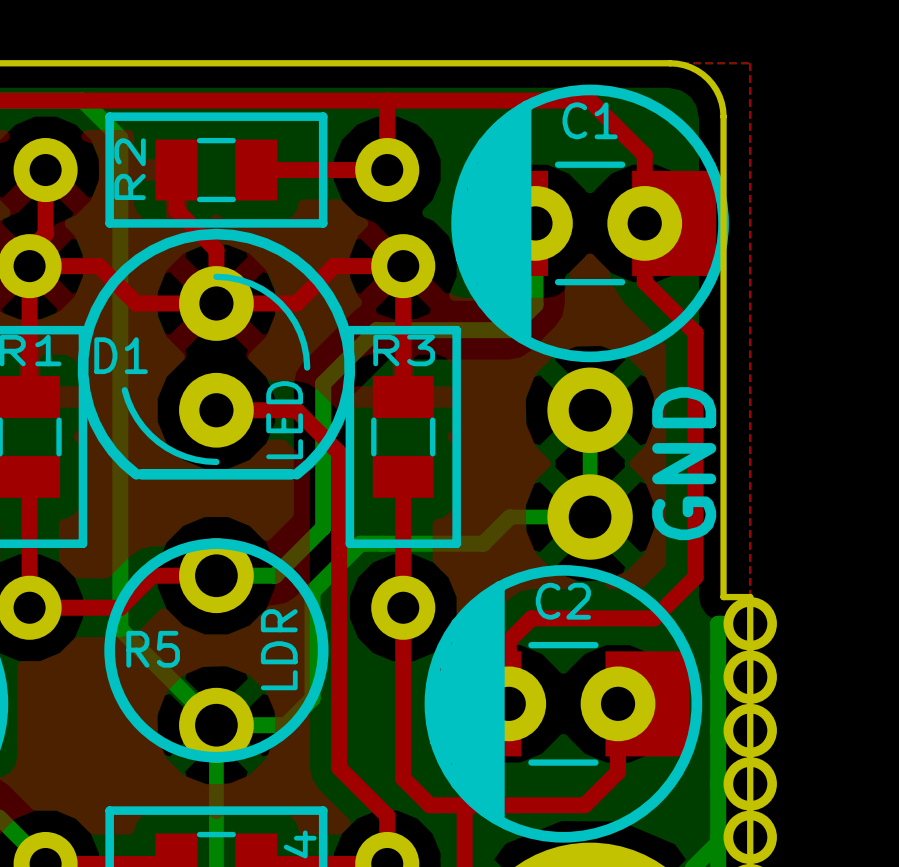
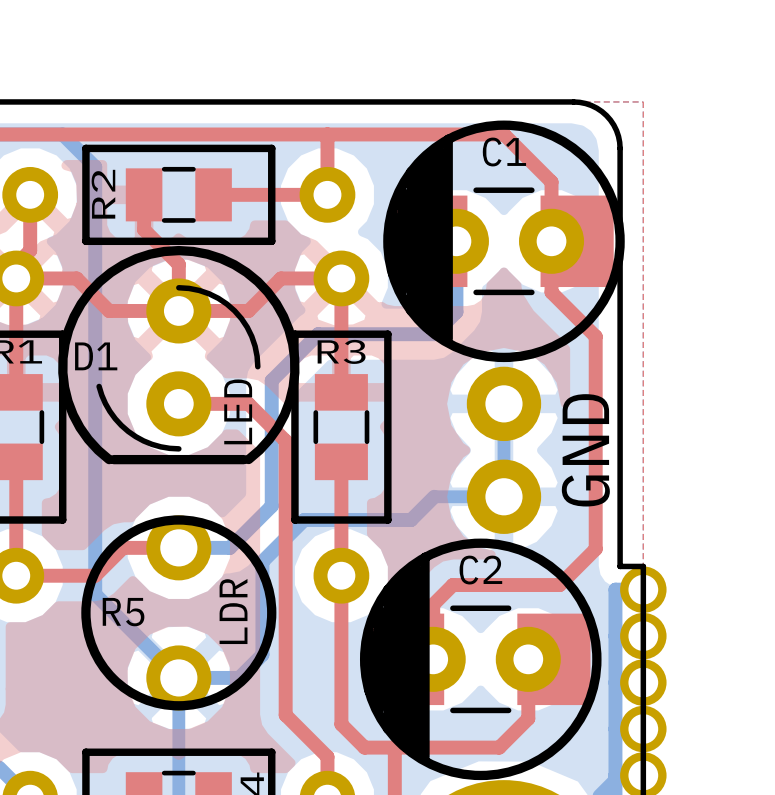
part: (590, 410) -> none
part: none -> (503, 450)
part: (590, 517) -> none

